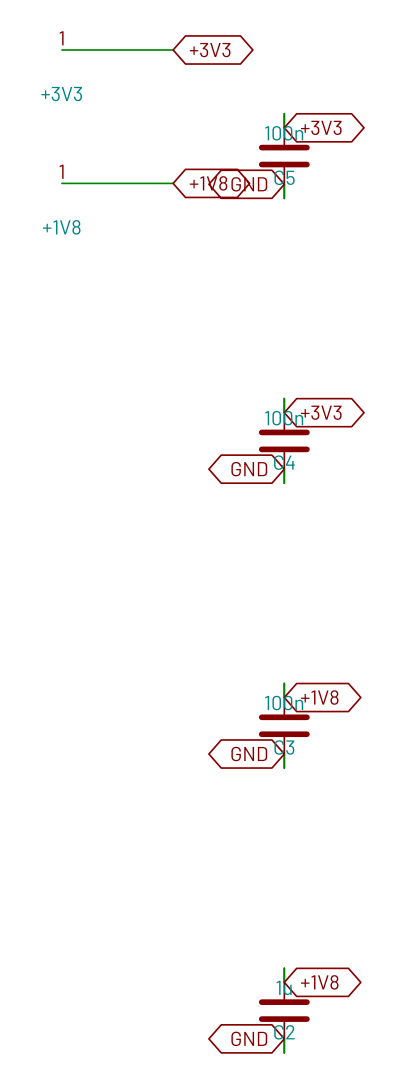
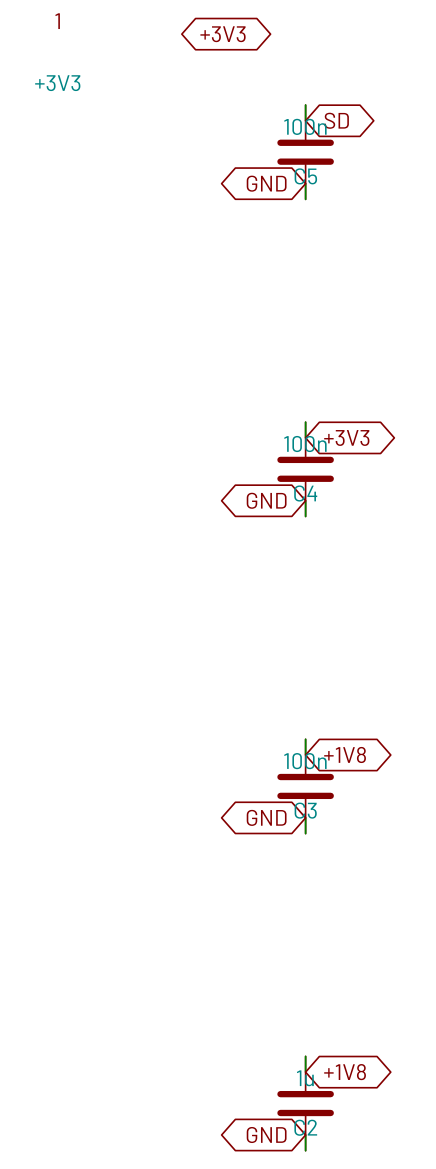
wire: (61, 49) (173, 49) -> none
global label: +3V3 (321, 127) -> SD (336, 120)
wire: (61, 183) (173, 183) -> none
global label: +1V8 (208, 183) -> none
power symbol: +1V8 (61, 199) -> none

